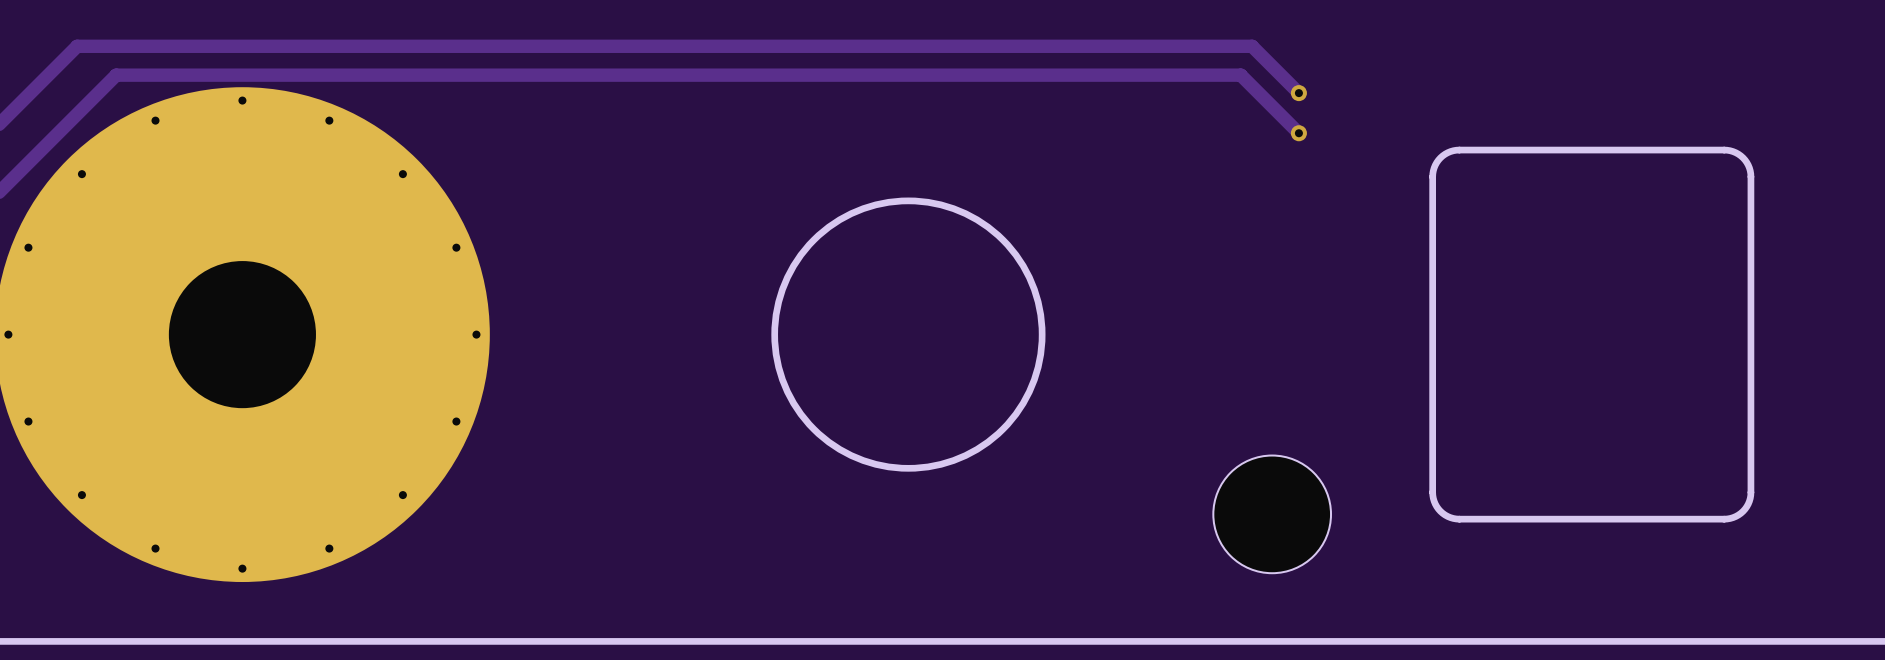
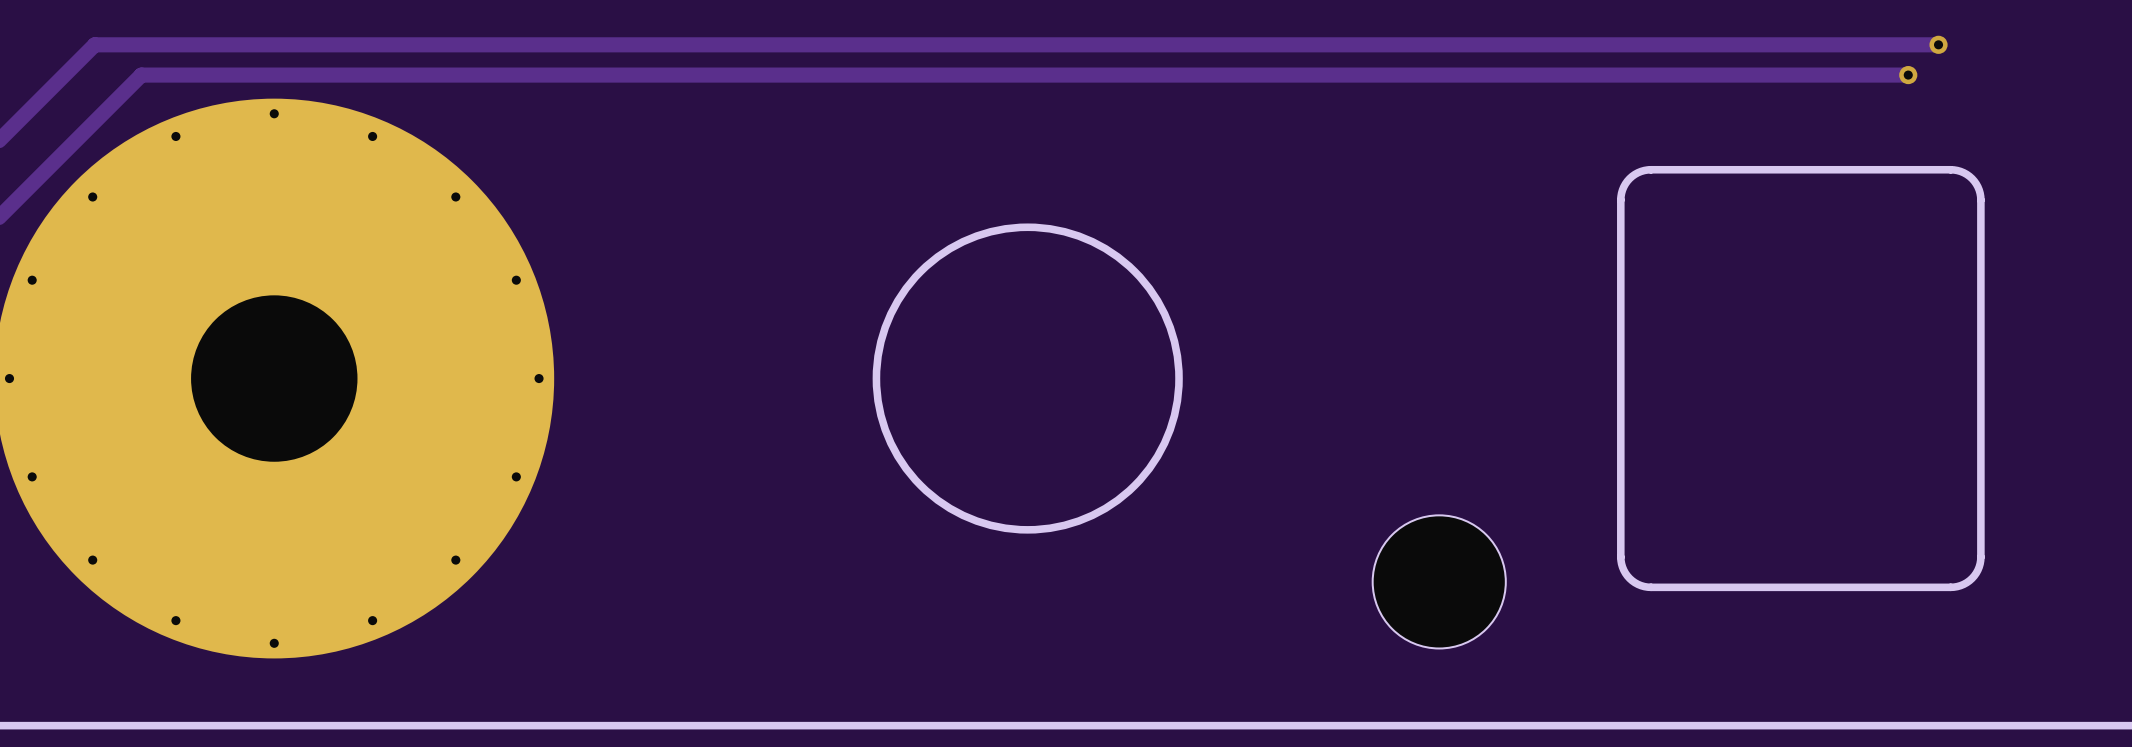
via: none -> (1938, 44)
track: (77, 46) (1252, 46) (1298, 93) -> (87, 52) (94, 44) (1938, 44)
via: none -> (1908, 75)
track: (116, 75) (1240, 75) (1298, 133) -> (131, 85) (141, 75) (1908, 75)
via: (1298, 93) -> none
via: (1298, 133) -> none

